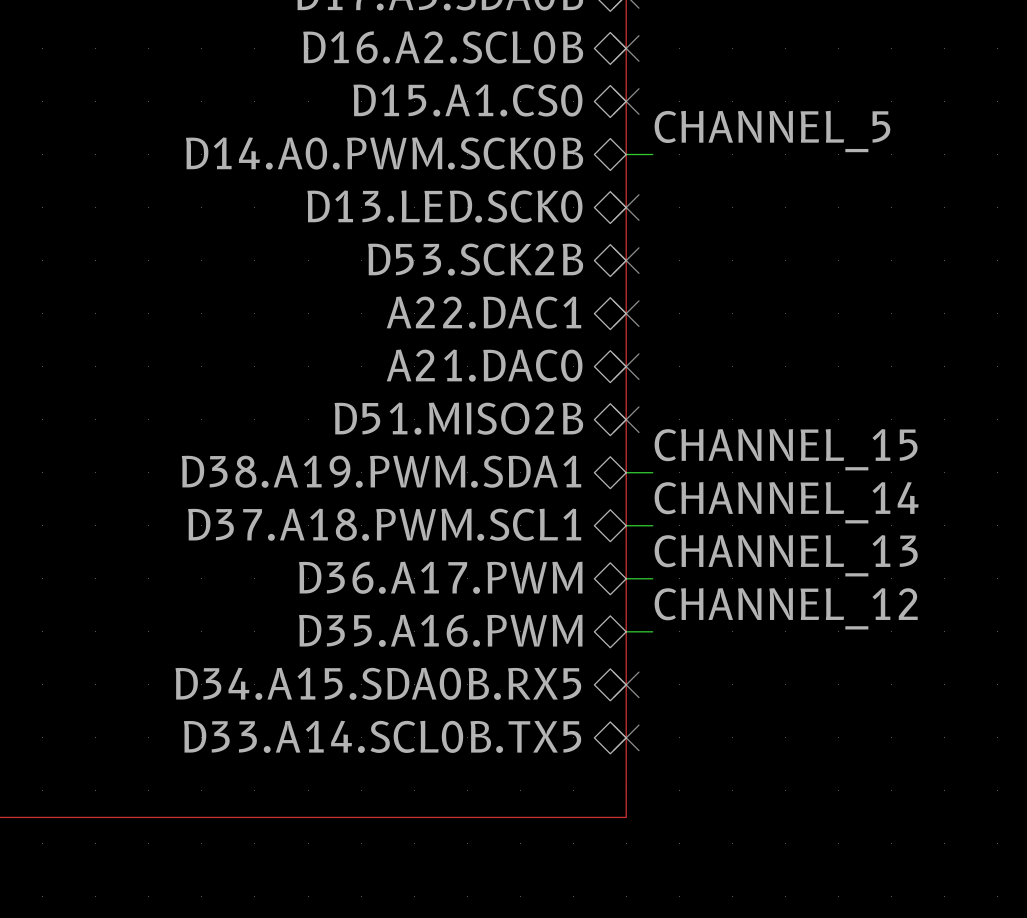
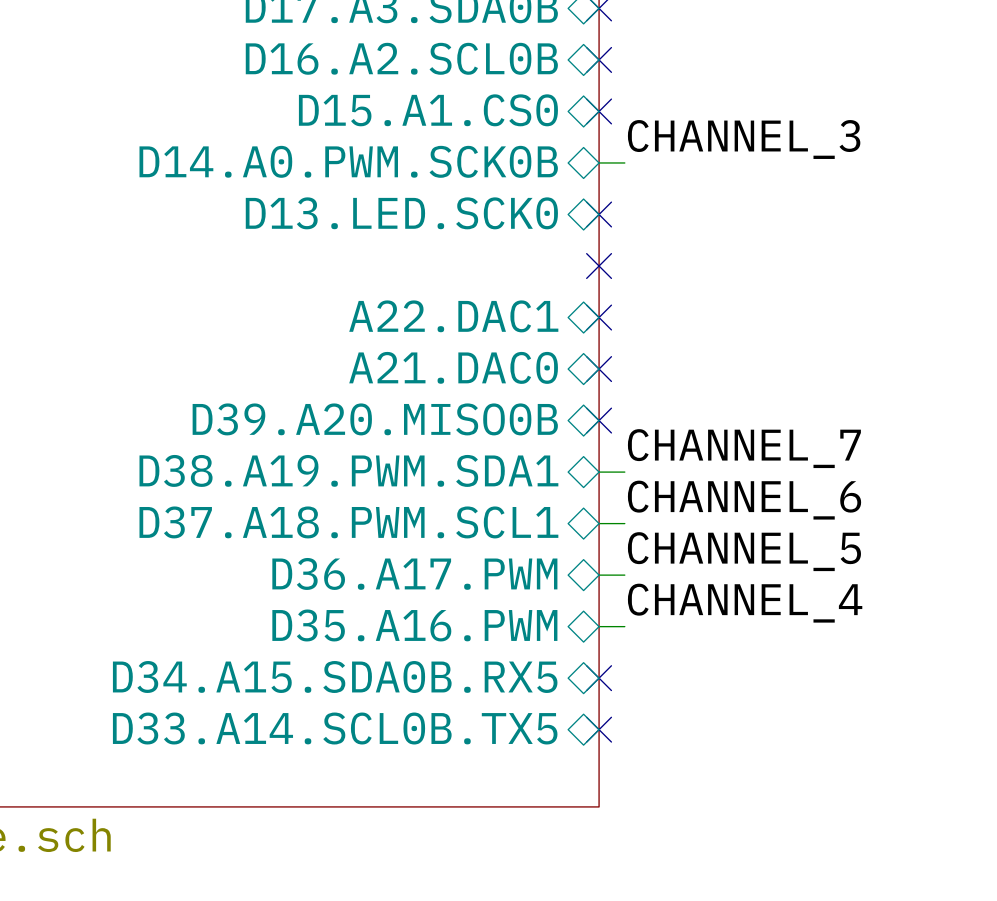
label: CHANNEL_5 (772, 131) -> CHANNEL_3 (744, 139)
sheet pin: D53.SCK2B (475, 259) -> none
sheet pin: D51.MISO2B (458, 418) -> D39.A20.MISO0B (375, 419)
label: CHANNEL_15 (786, 449) -> CHANNEL_7 (744, 448)
label: CHANNEL_14 (786, 502) -> CHANNEL_6 (744, 500)
label: CHANNEL_13 (786, 555) -> CHANNEL_5 (744, 551)
label: CHANNEL_12 (786, 608) -> CHANNEL_4 (745, 603)

